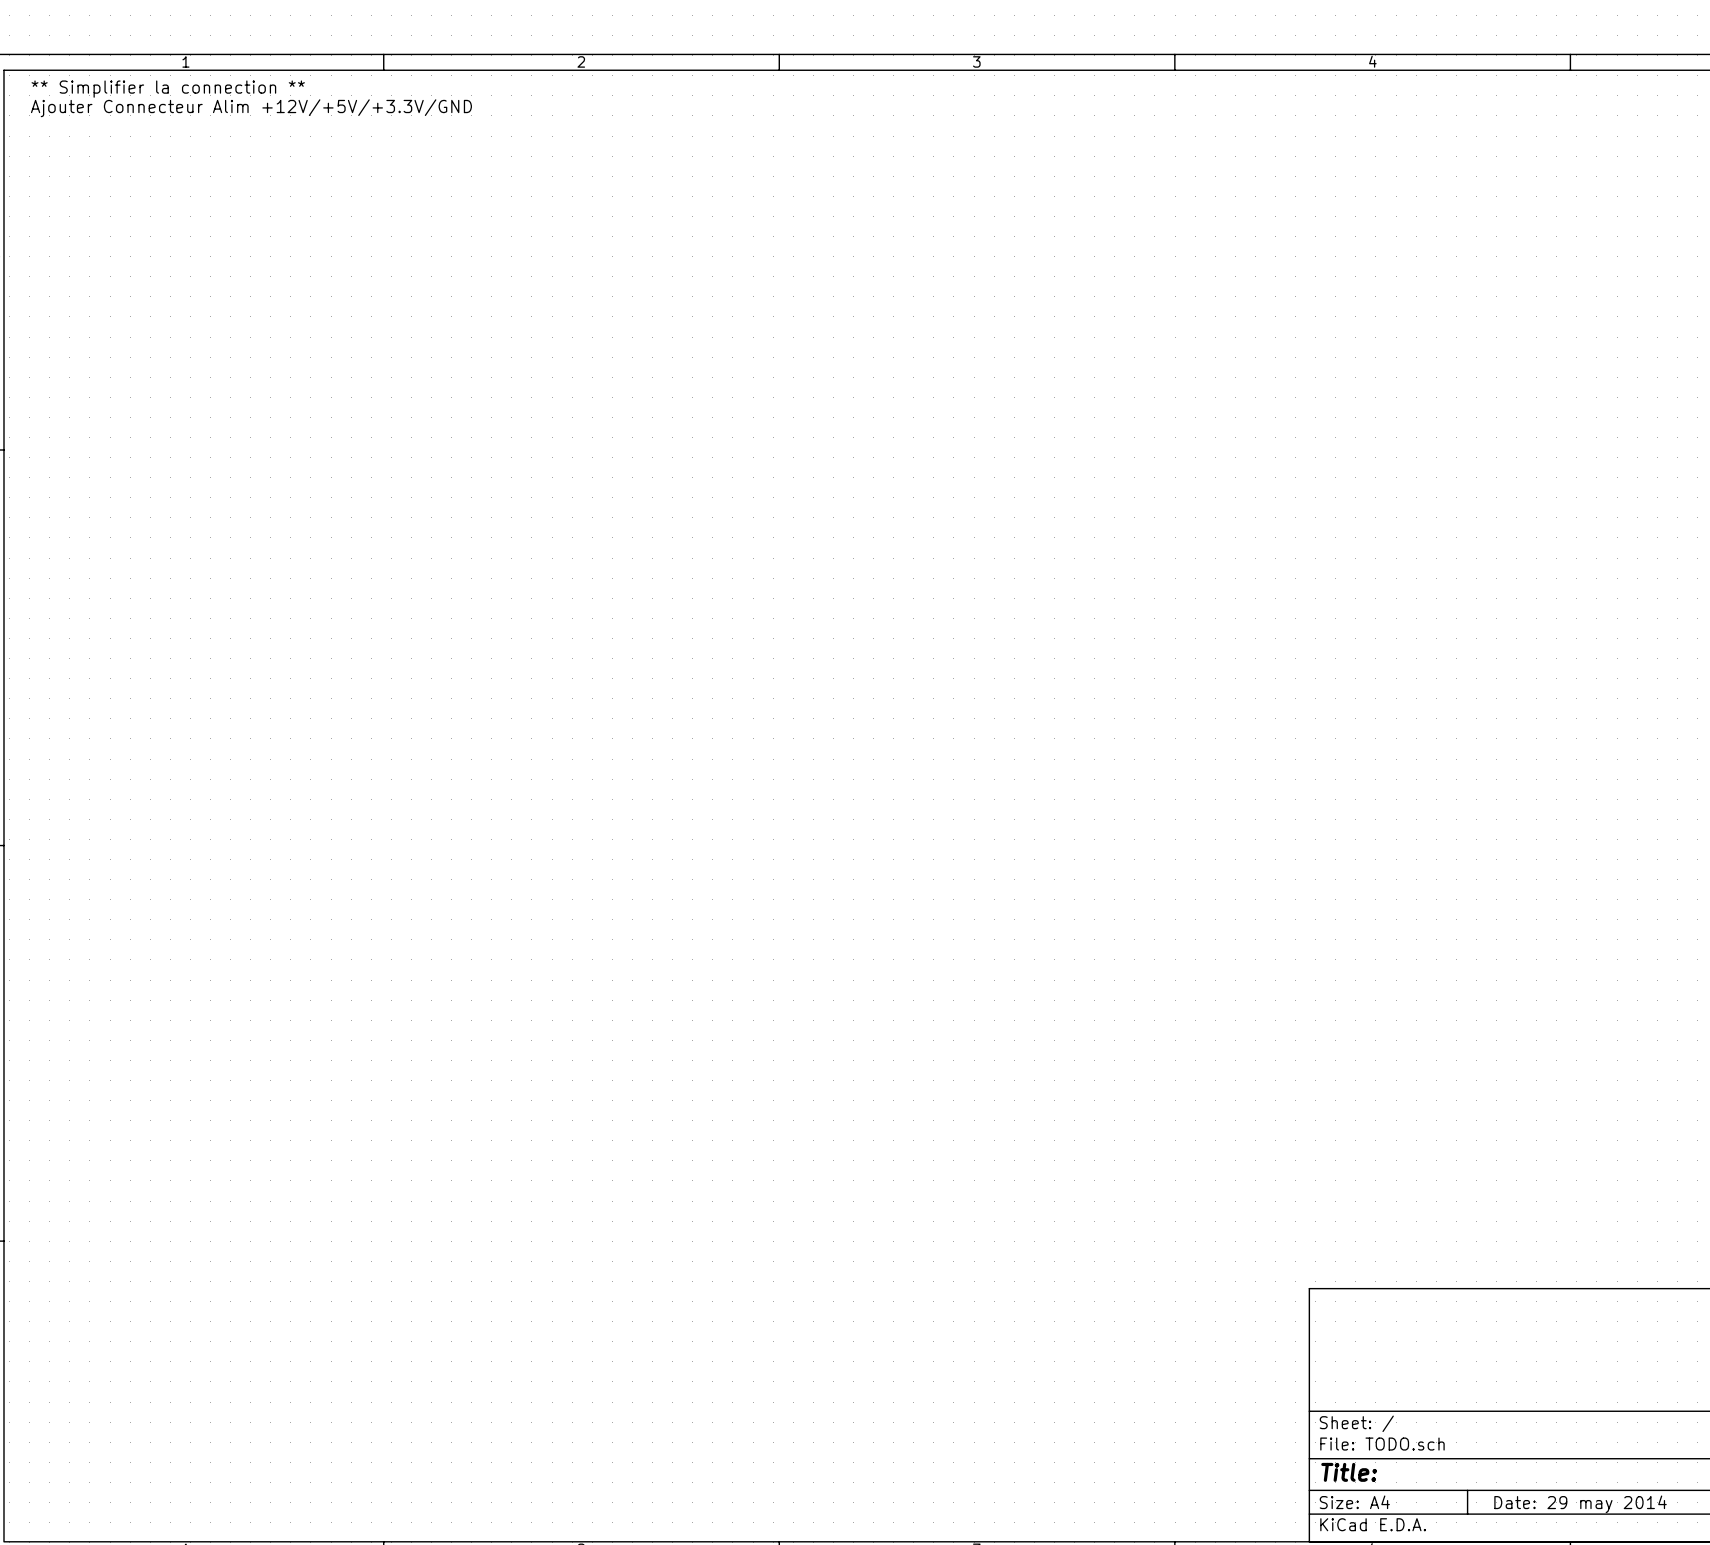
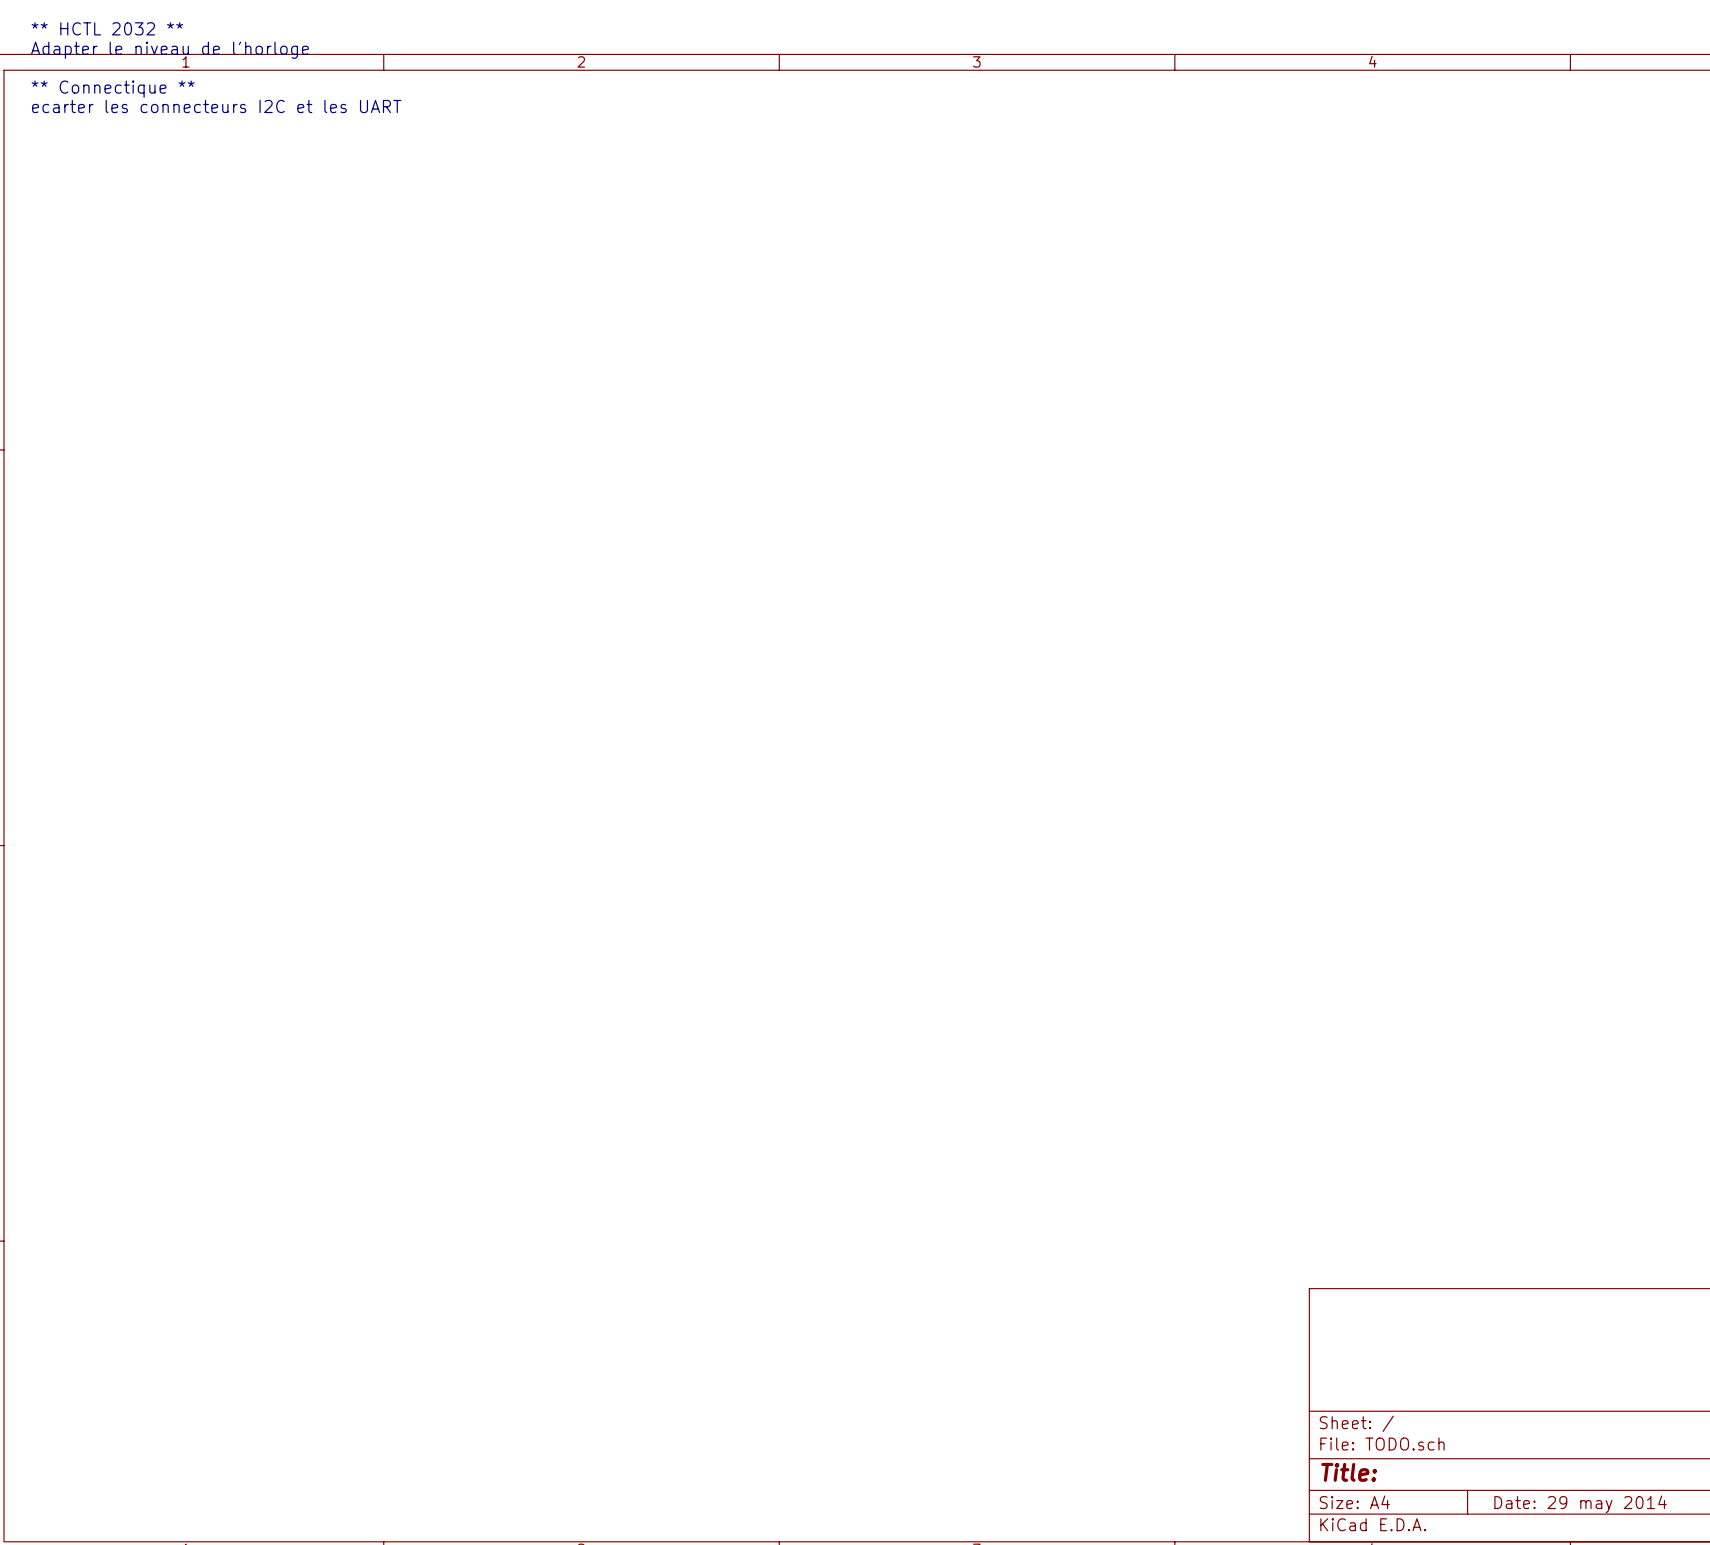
text: none -> ** HCTL 2032 ** (107, 28)
text: none -> Adapter le niveau de l'horloge (169, 50)
text: ** Simplifier la connection ** (168, 89) -> ** Connectique ** (113, 89)
text: Ajouter Connecteur Alim +12V/+5V/+3.3V/GND (251, 108) -> ecarter les connecteurs I2C et les UART (216, 106)

